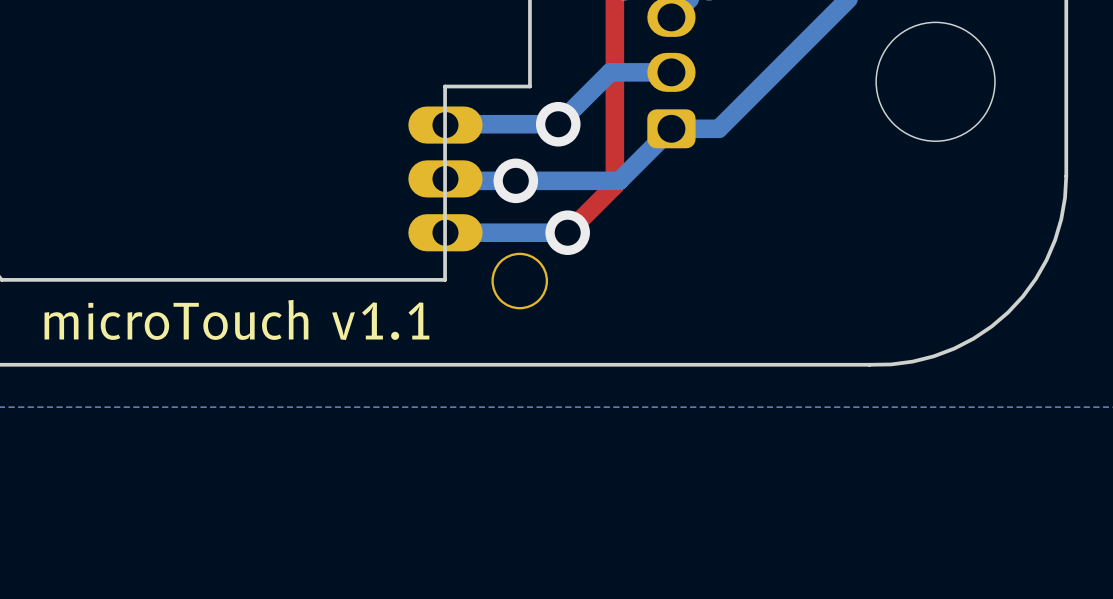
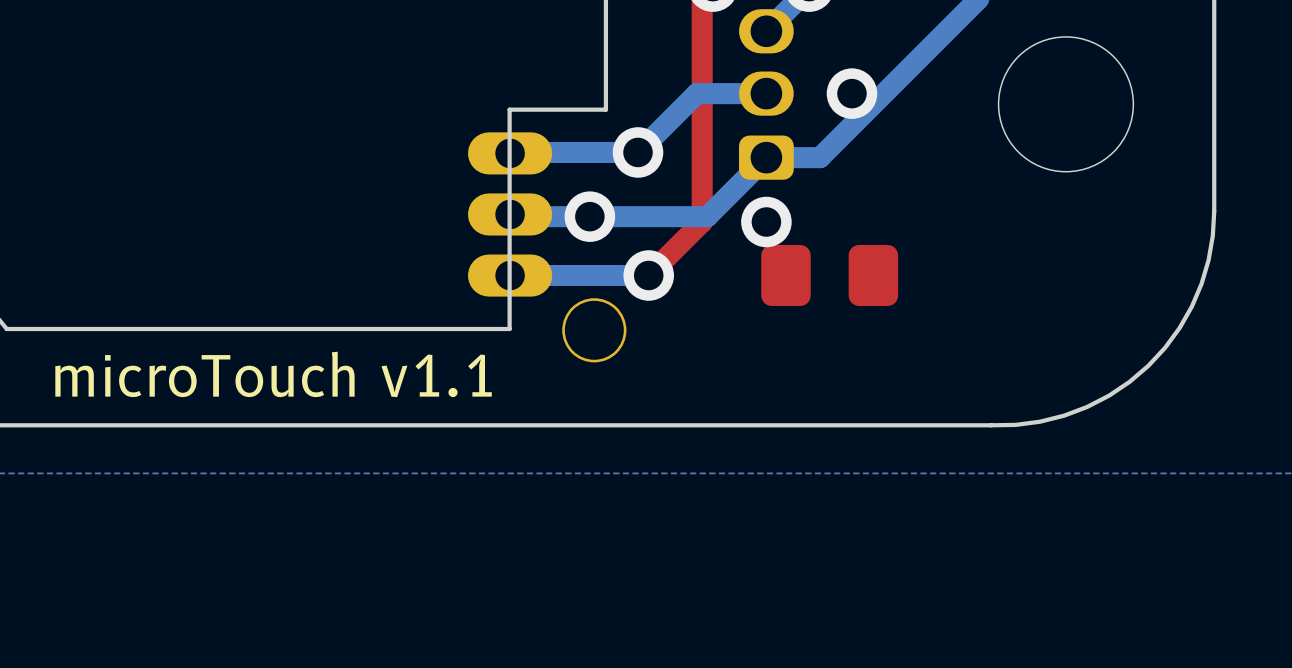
via: none -> (851, 93)
via: none -> (766, 222)
part: none -> (829, 275)

